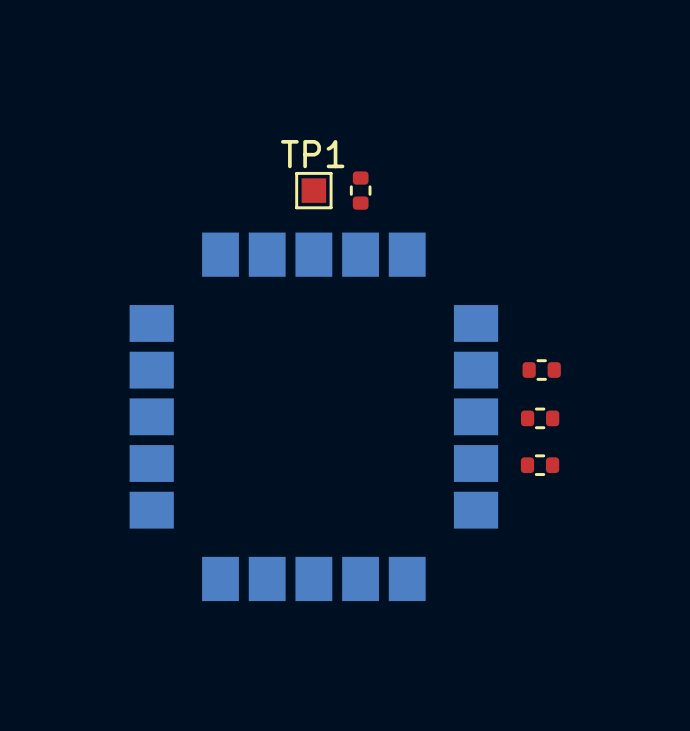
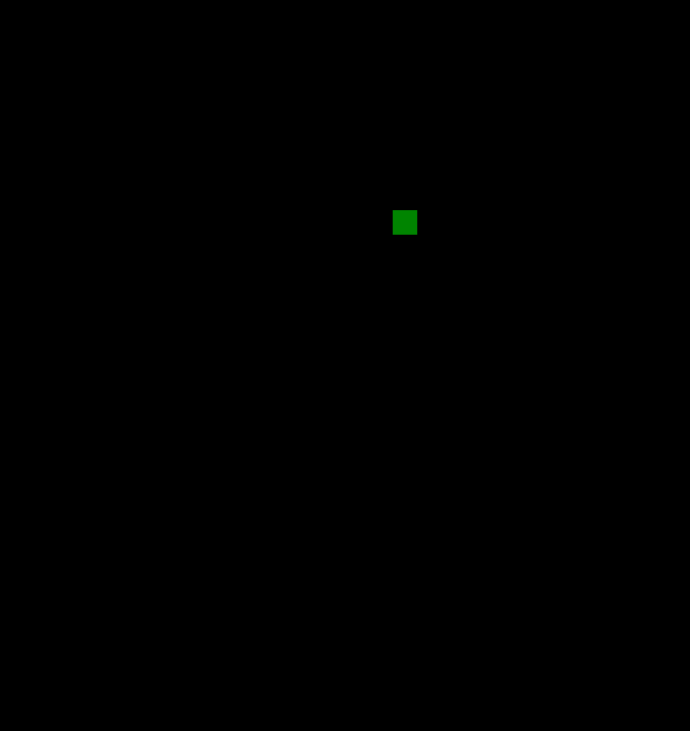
TP1 side: top (313, 190) -> bottom (404, 222)
part: (360, 190) -> none
part: (541, 370) -> none
part: (313, 416) -> none
part: (540, 418) -> none
part: (540, 465) -> none

